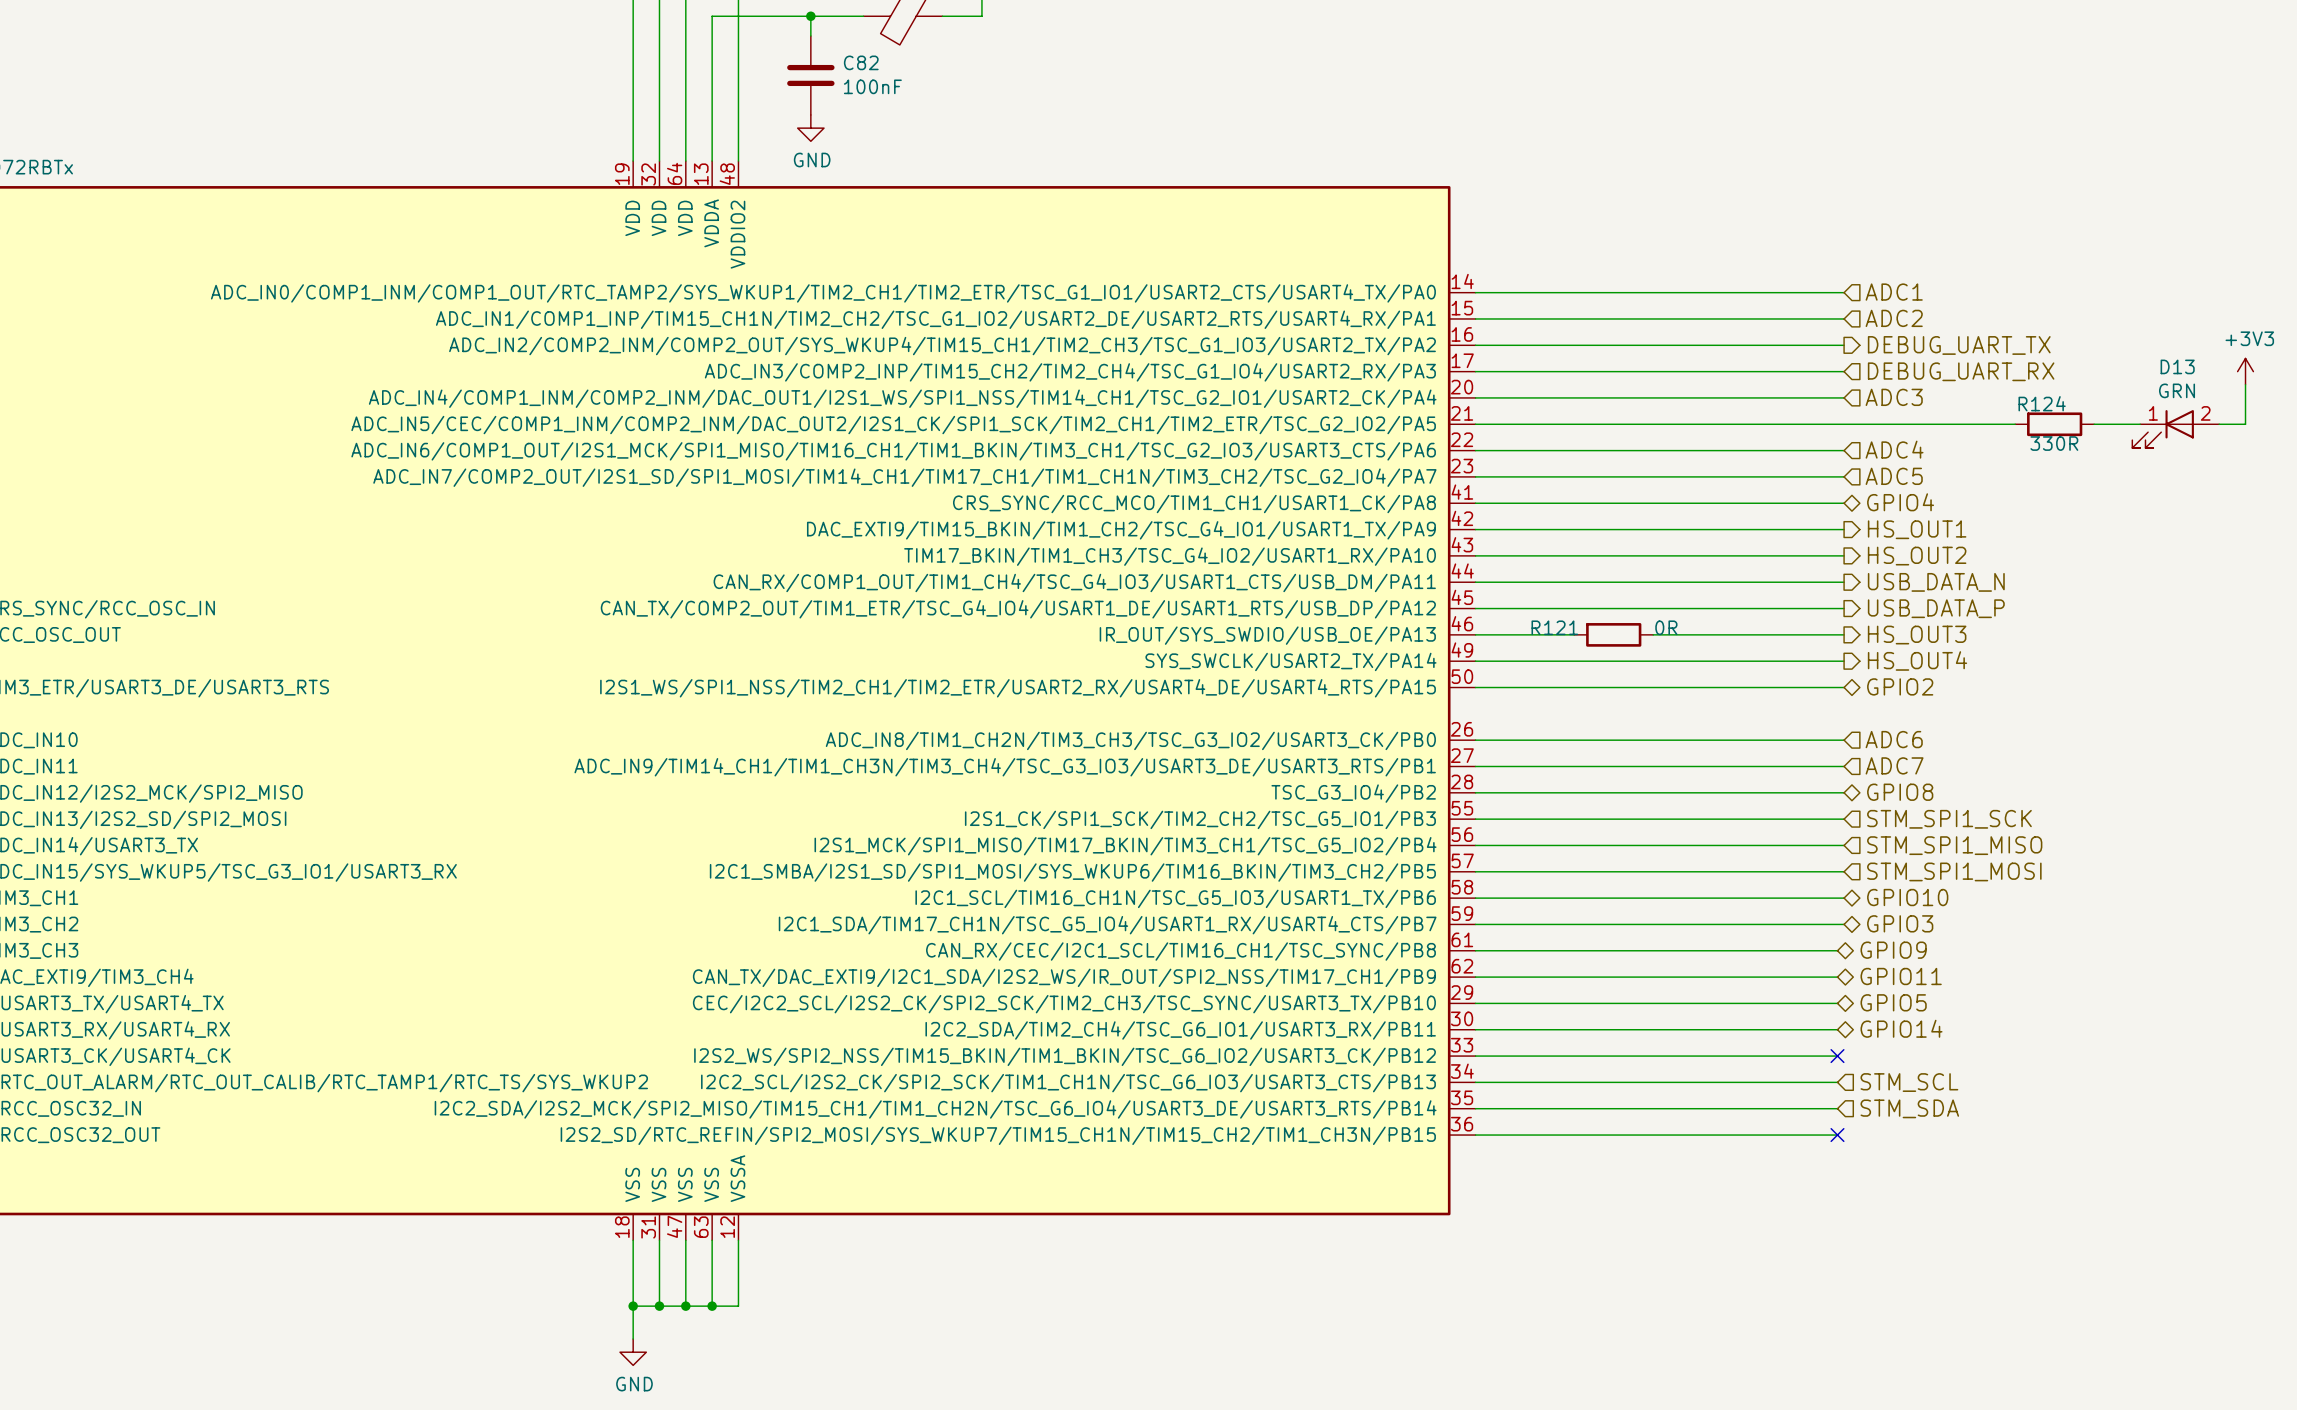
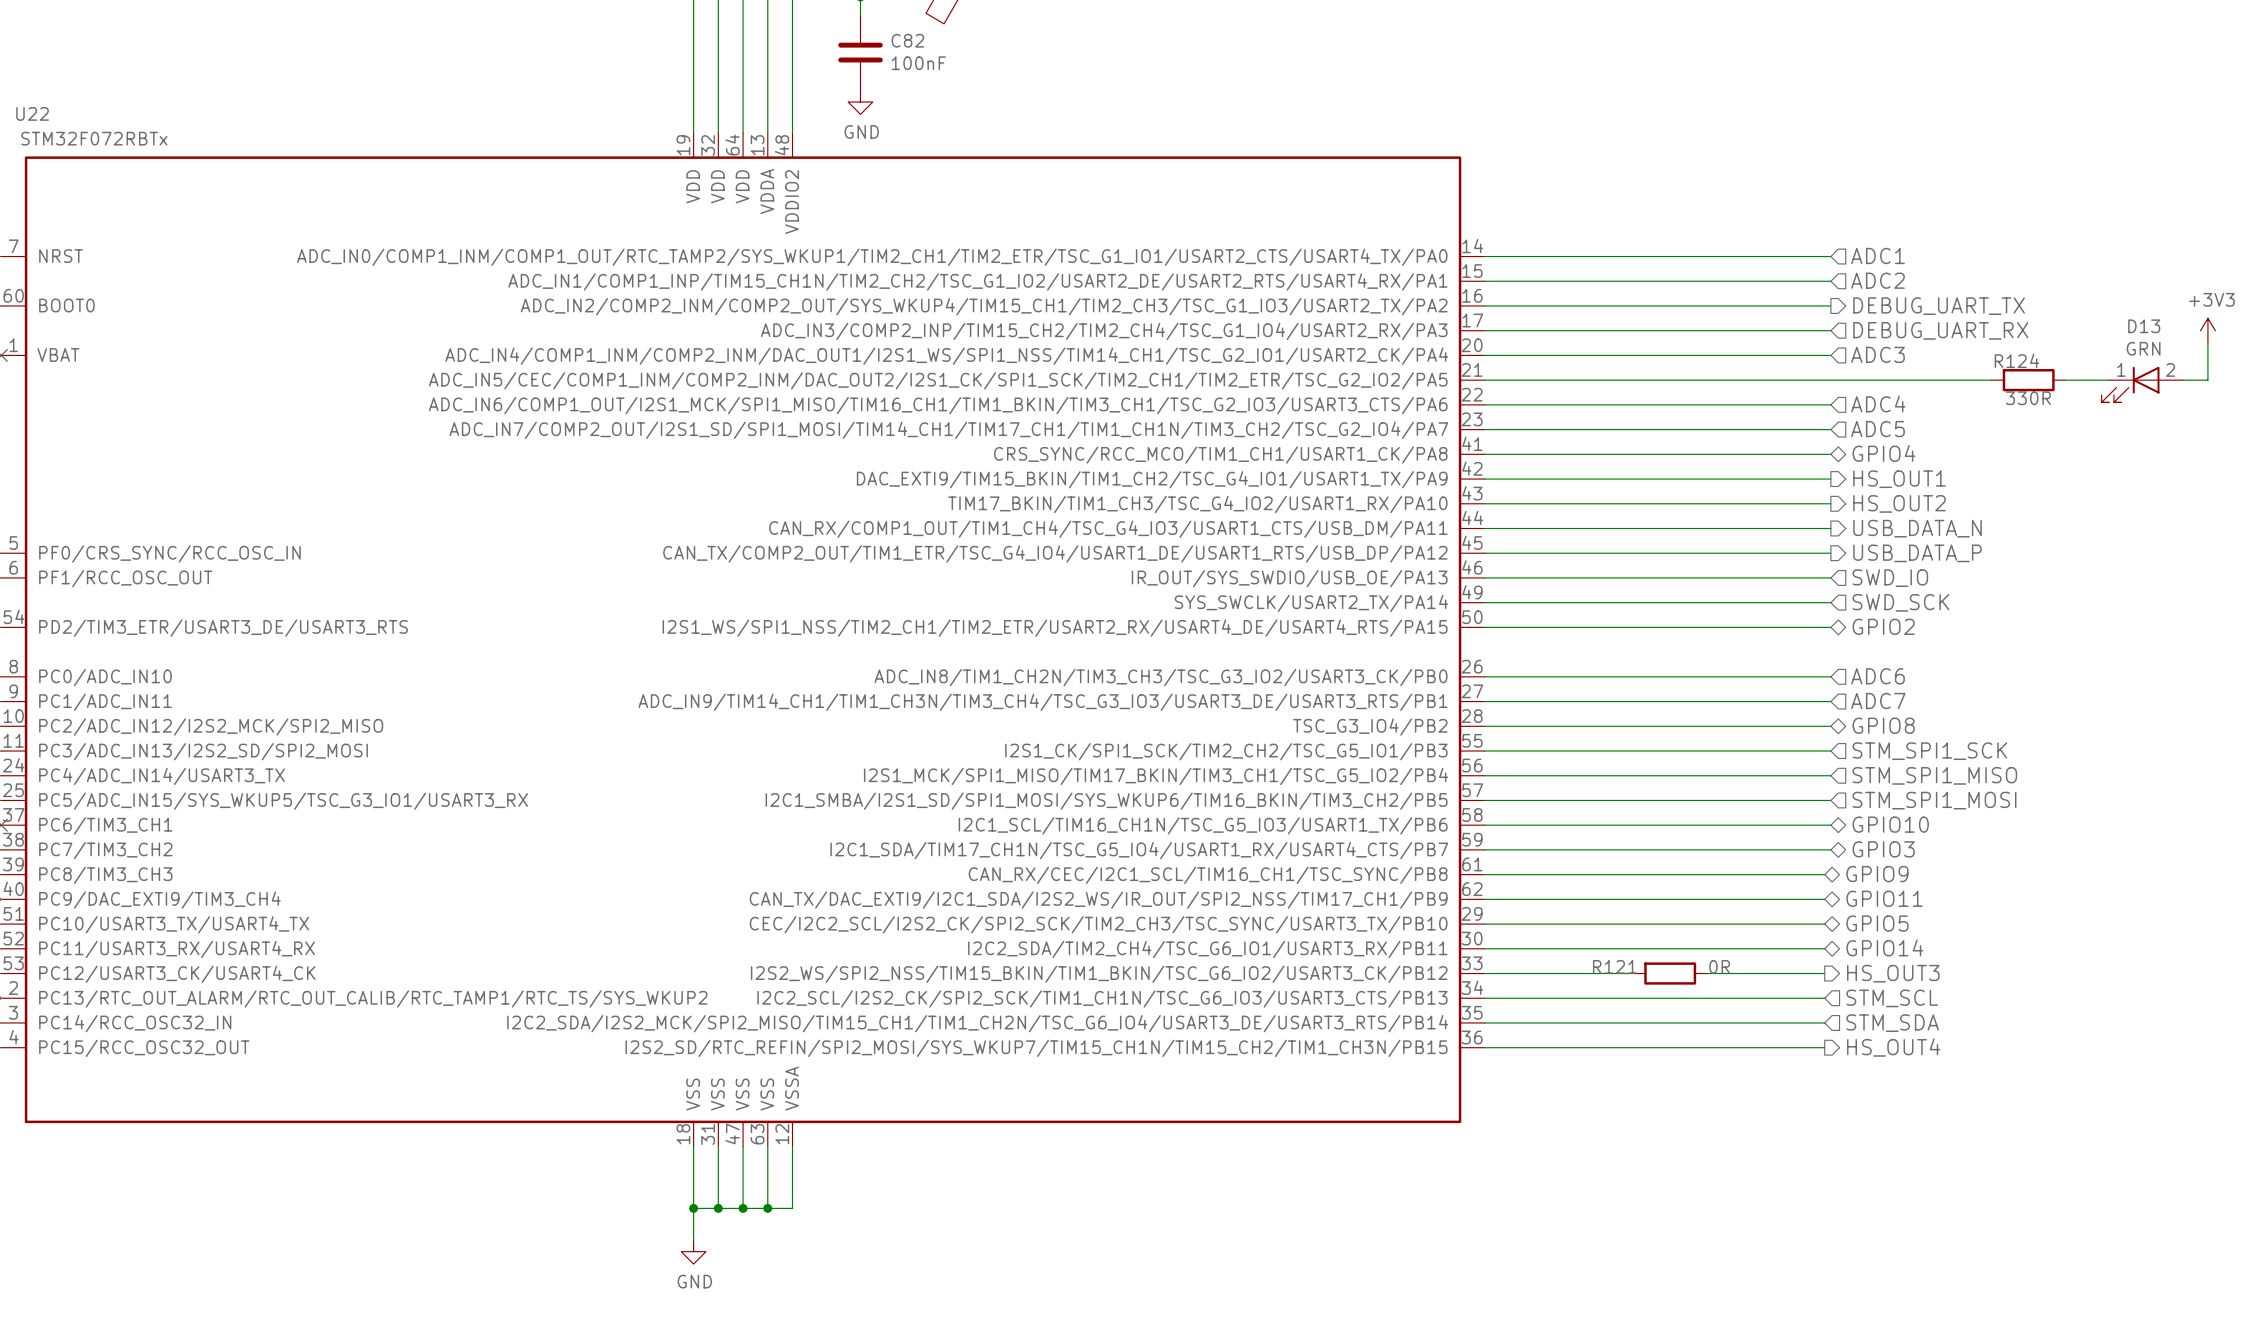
wire: none -> (1577, 577) (1651, 577)
R121 position: (1613, 634) -> (1670, 973)
hierarchical label shape: output (1917, 635) -> input (1890, 578)
hierarchical label: HS_OUT3 (1917, 635) -> SWD_IO (1890, 578)
hierarchical label shape: output (1917, 660) -> input (1900, 602)
hierarchical label: HS_OUT4 (1917, 660) -> SWD_SCK (1900, 602)
wire: (1633, 1056) (1712, 1056) -> none
no-connect mark: (1837, 1056) -> none
hierarchical label: none -> HS_OUT3 (1893, 973)
hierarchical label: none -> HS_OUT4 (1893, 1047)
no-connect mark: (1837, 1135) -> none

